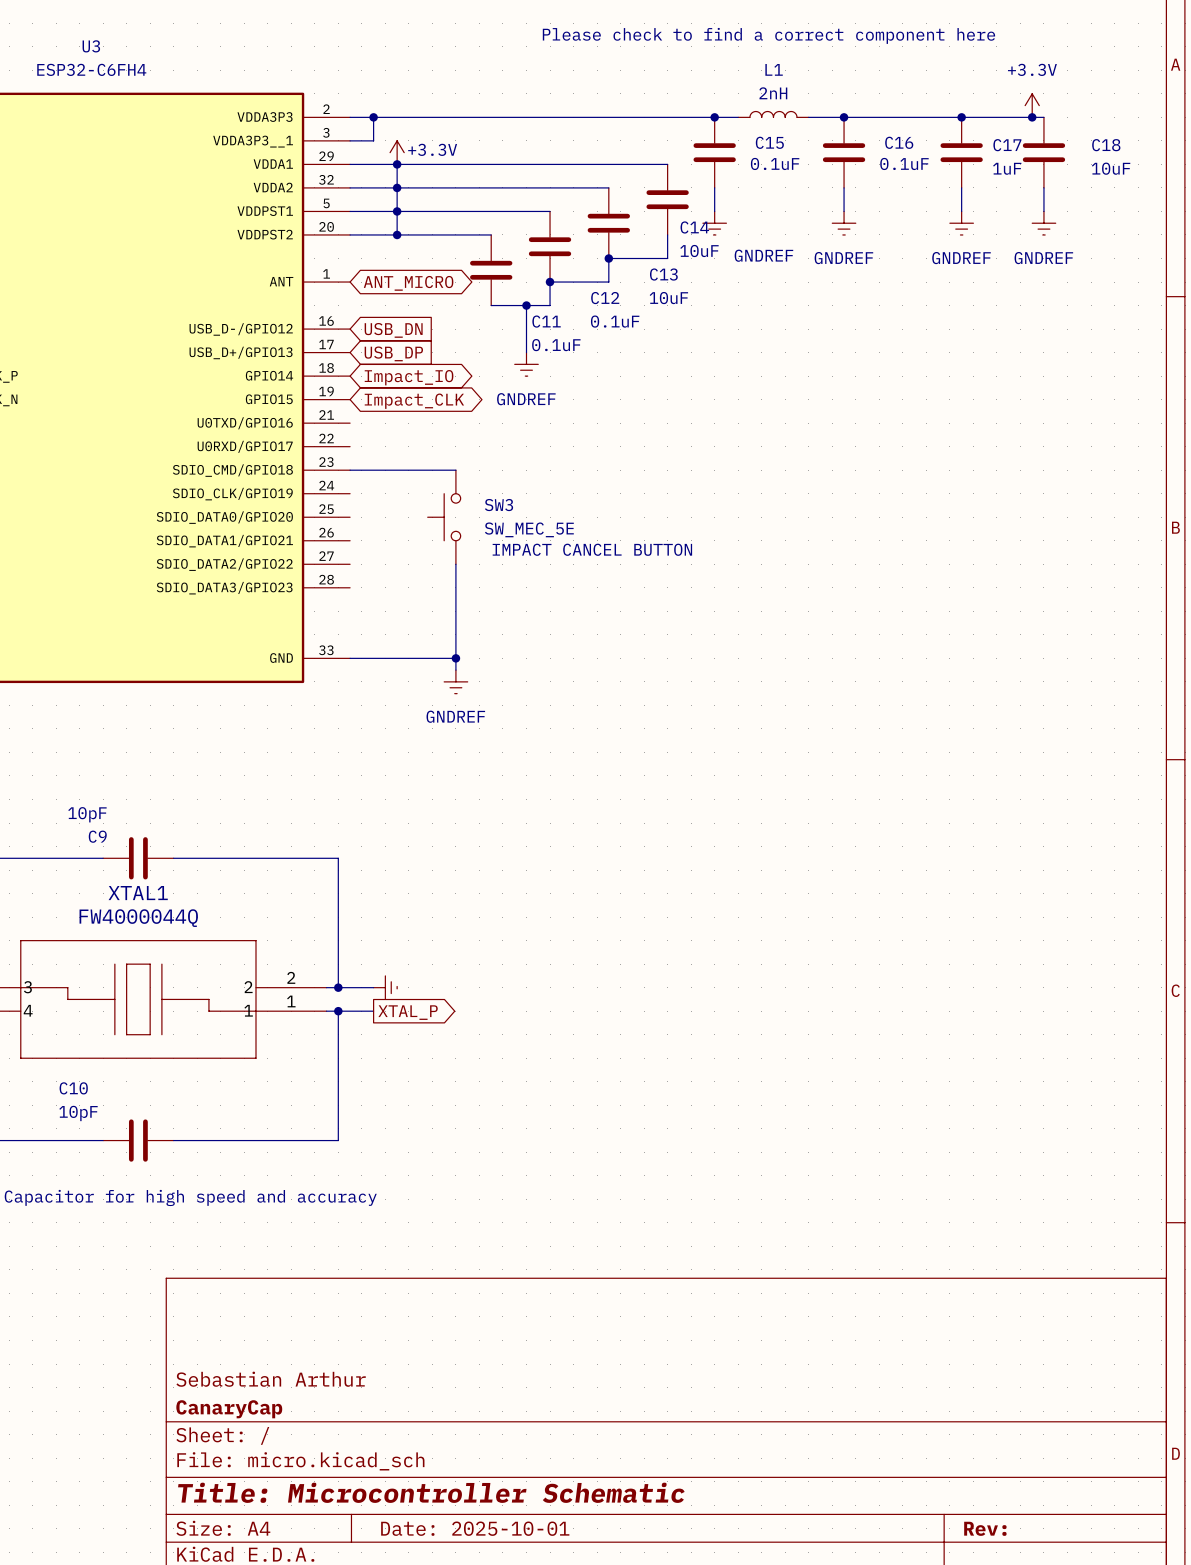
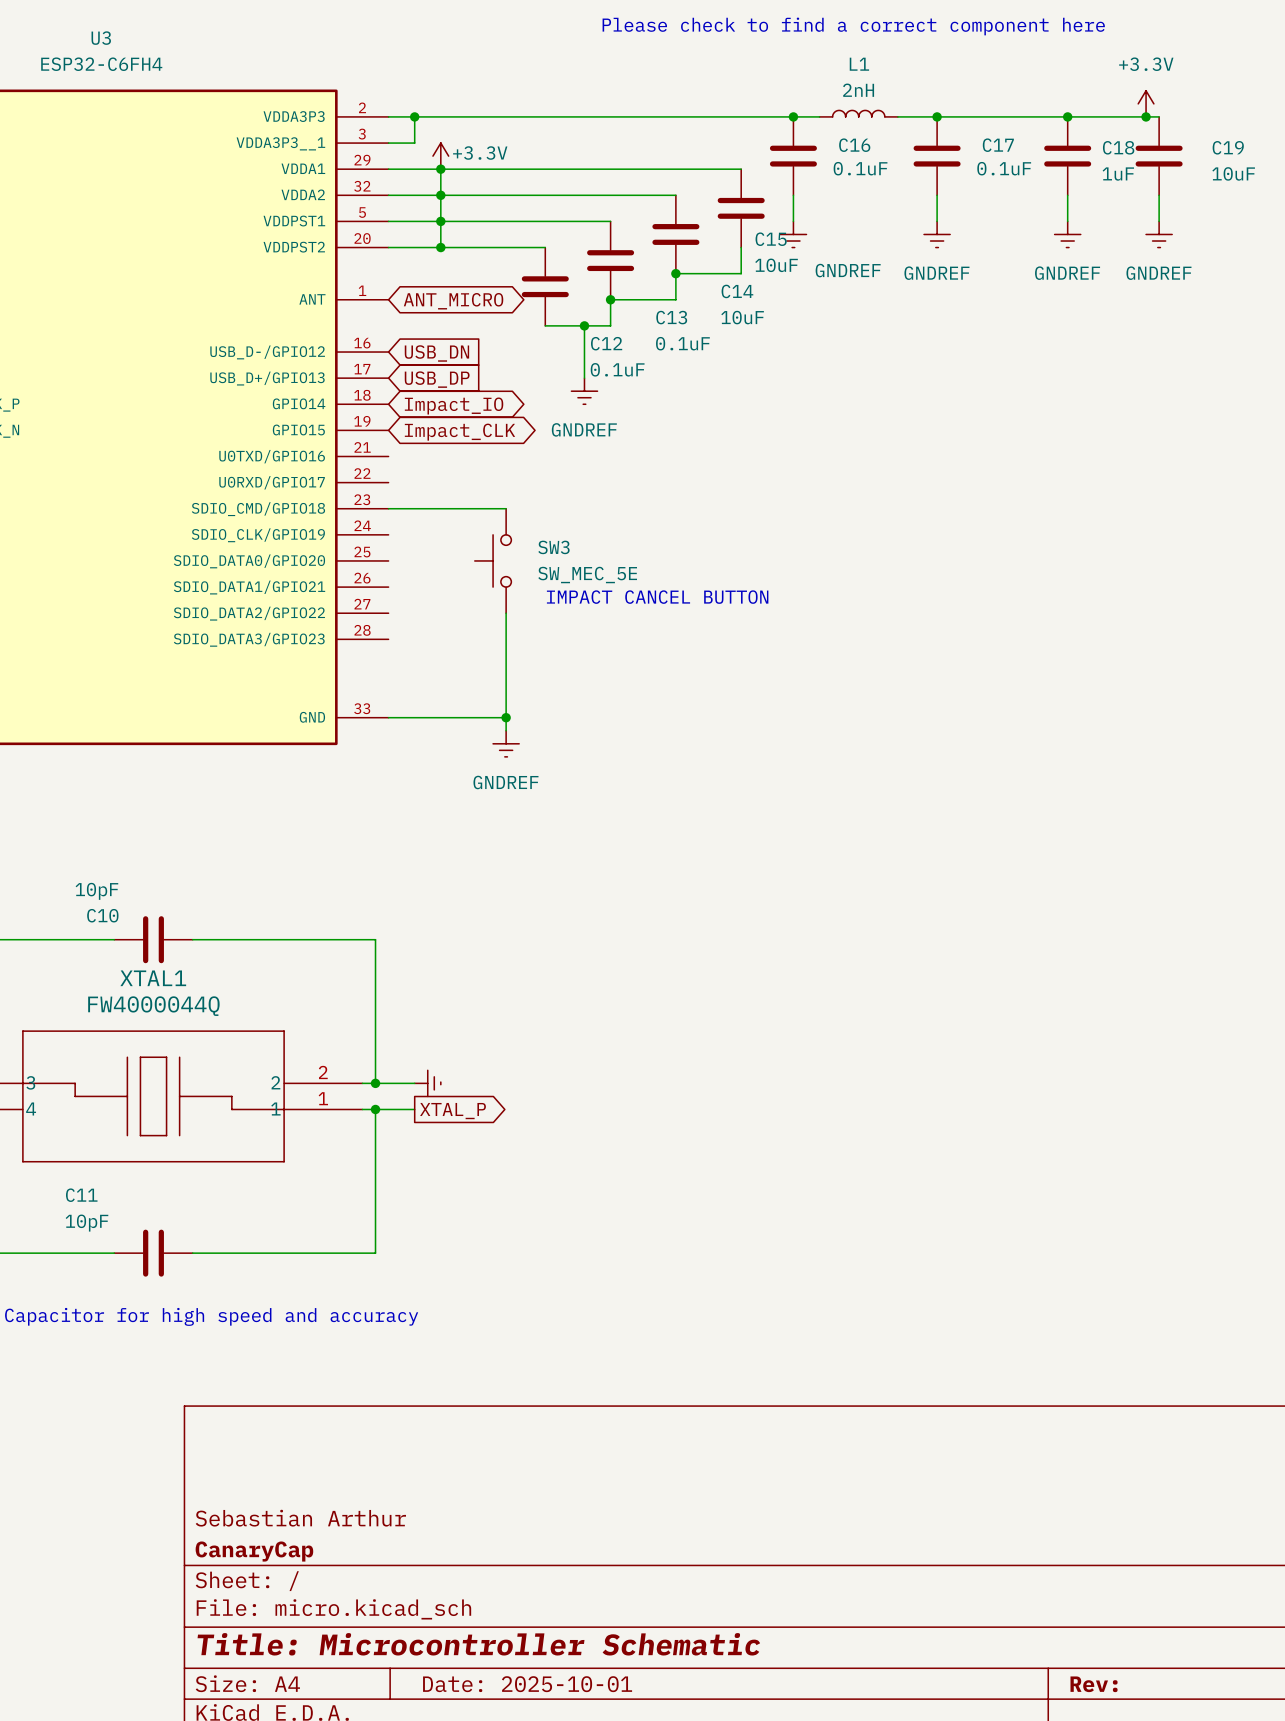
C15 name: C15 (769, 142) -> C16 (854, 145)
C16 name: C16 (899, 142) -> C17 (998, 145)
C17 name: C17 (1007, 145) -> C18 (1118, 147)
C18 name: C18 (1106, 145) -> C19 (1228, 147)
C14 name: C14 (694, 227) -> C15 (771, 239)
C13 name: C13 (663, 274) -> C14 (737, 291)
C12 name: C12 (605, 298) -> C13 (671, 317)
C11 name: C11 (546, 321) -> C12 (606, 343)
C9 name: C9 (97, 836) -> C10 (102, 915)
C10 name: C10 (73, 1088) -> C11 (81, 1195)

